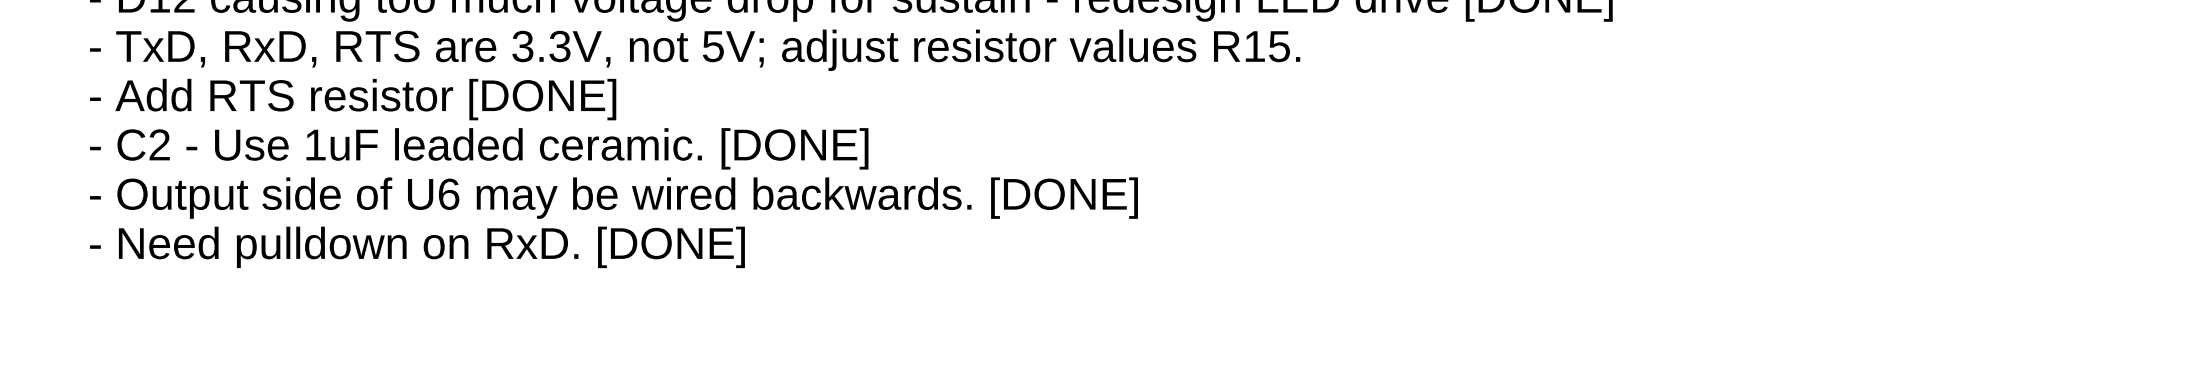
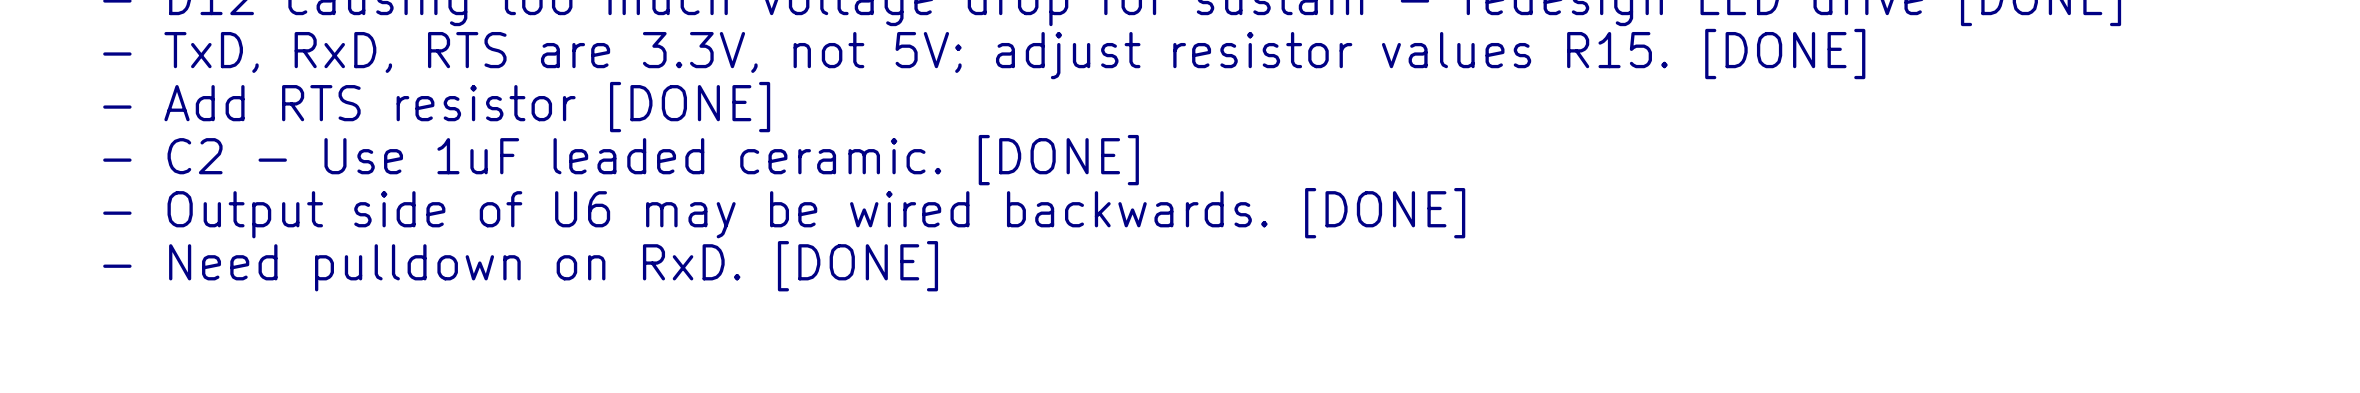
text: - TxD, RxD, RTS are 3.3V, not 5V; adjust resistor values R15. (695, 50) -> - TxD, RxD, RTS are 3.3V, not 5V; adjust resistor values R15. [DONE] (984, 54)

